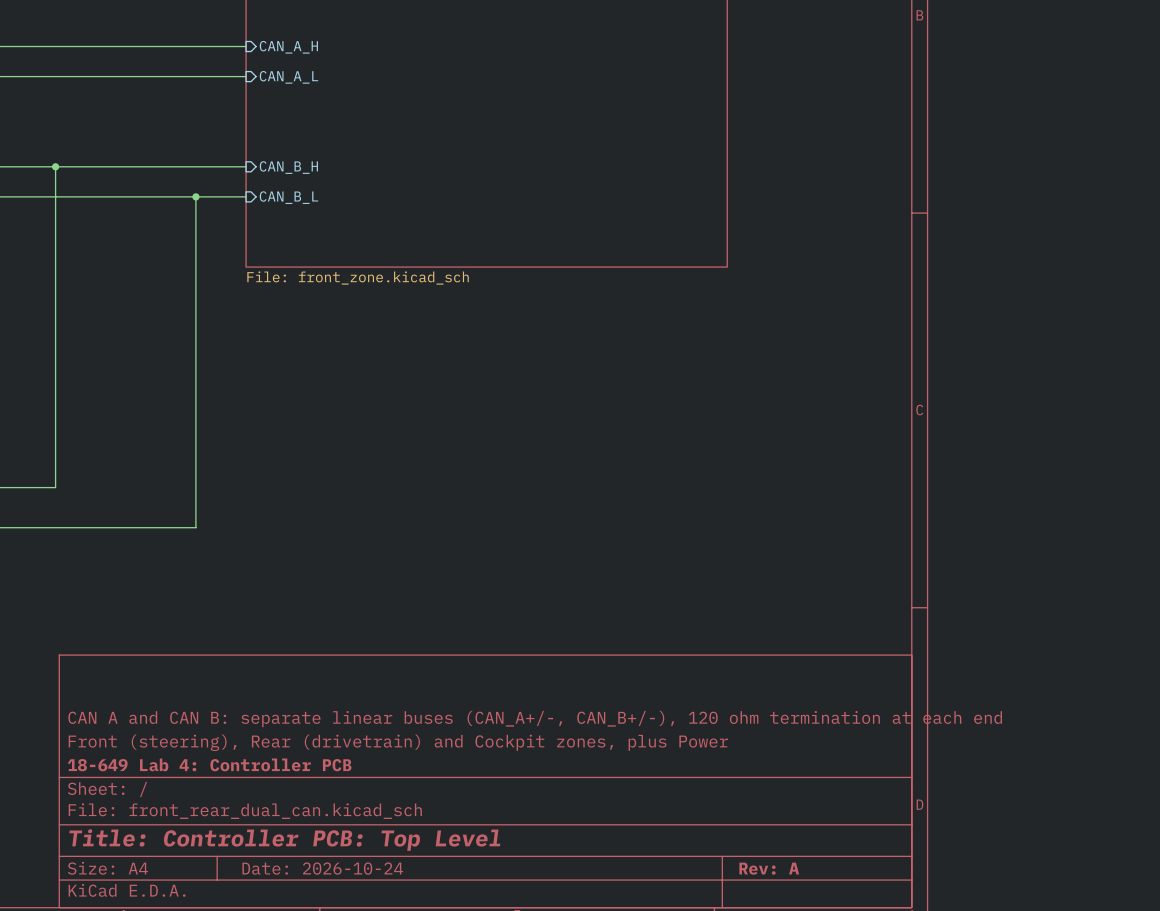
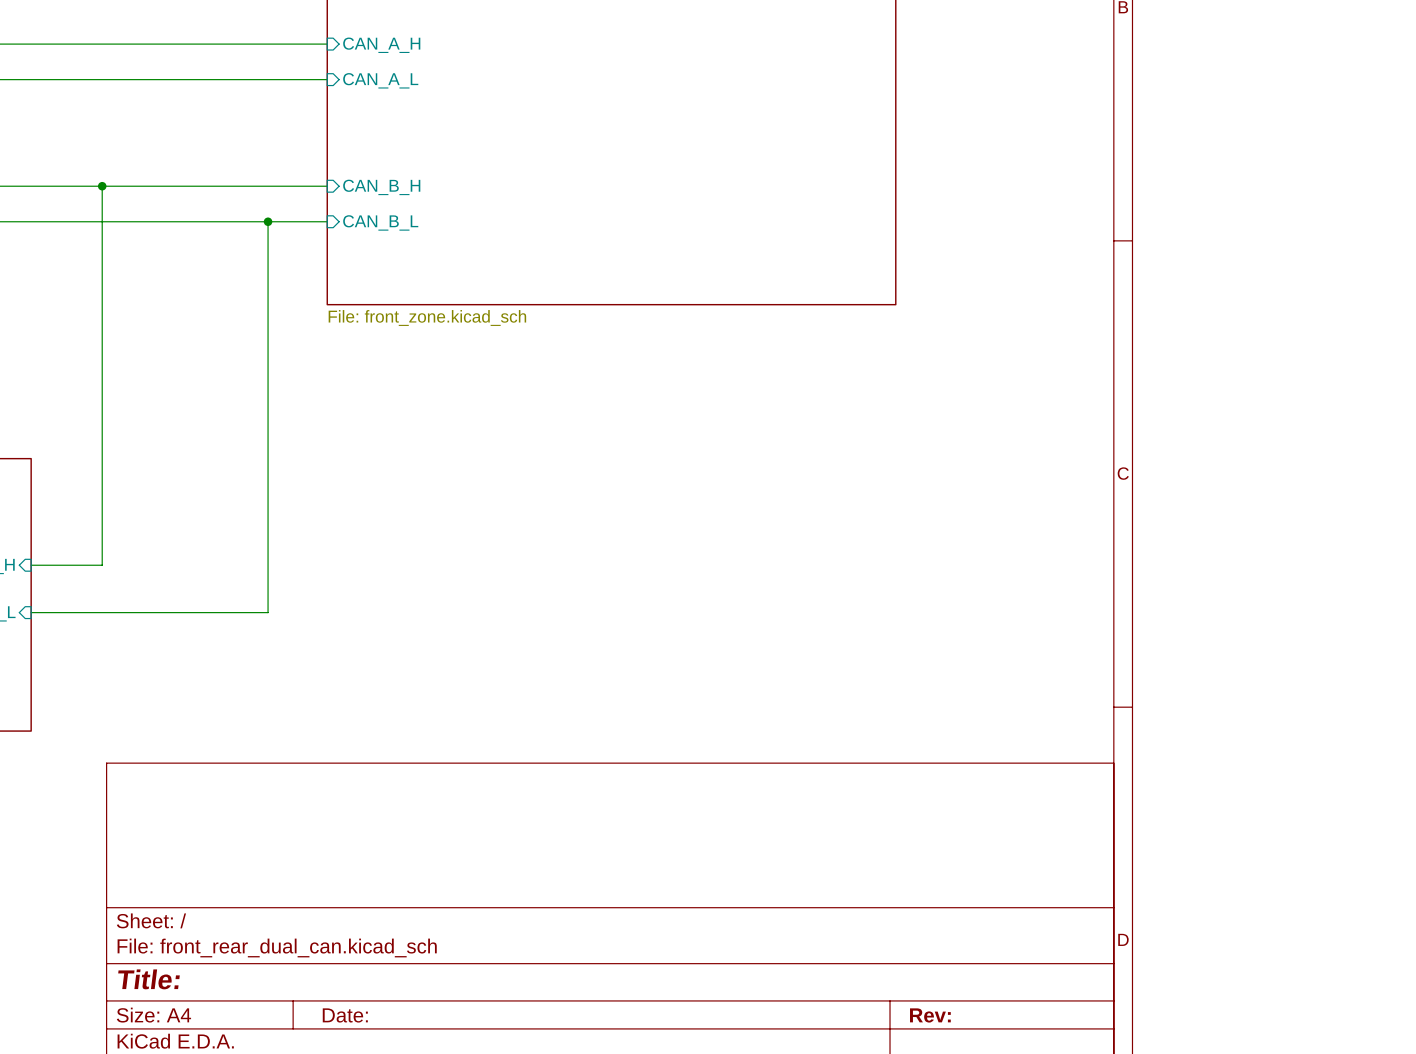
title block: CAN A and CAN B: separate linear buses (CAN_A+/-, CAN_B+/-), 120 ohm termination at each end (535, 718) -> none
title block: Front (steering), Rear (drivetrain) and Cockpit zones, plus Power (398, 742) -> none
title block: 18-649 Lab 4: Controller PCB (209, 764) -> none
title block: Title: Controller PCB: Top Level (284, 840) -> Title: (148, 979)
title block: Date: 2026-10-24 (322, 868) -> Date: (345, 1015)
title block: Rev: A (769, 868) -> Rev: (930, 1015)

